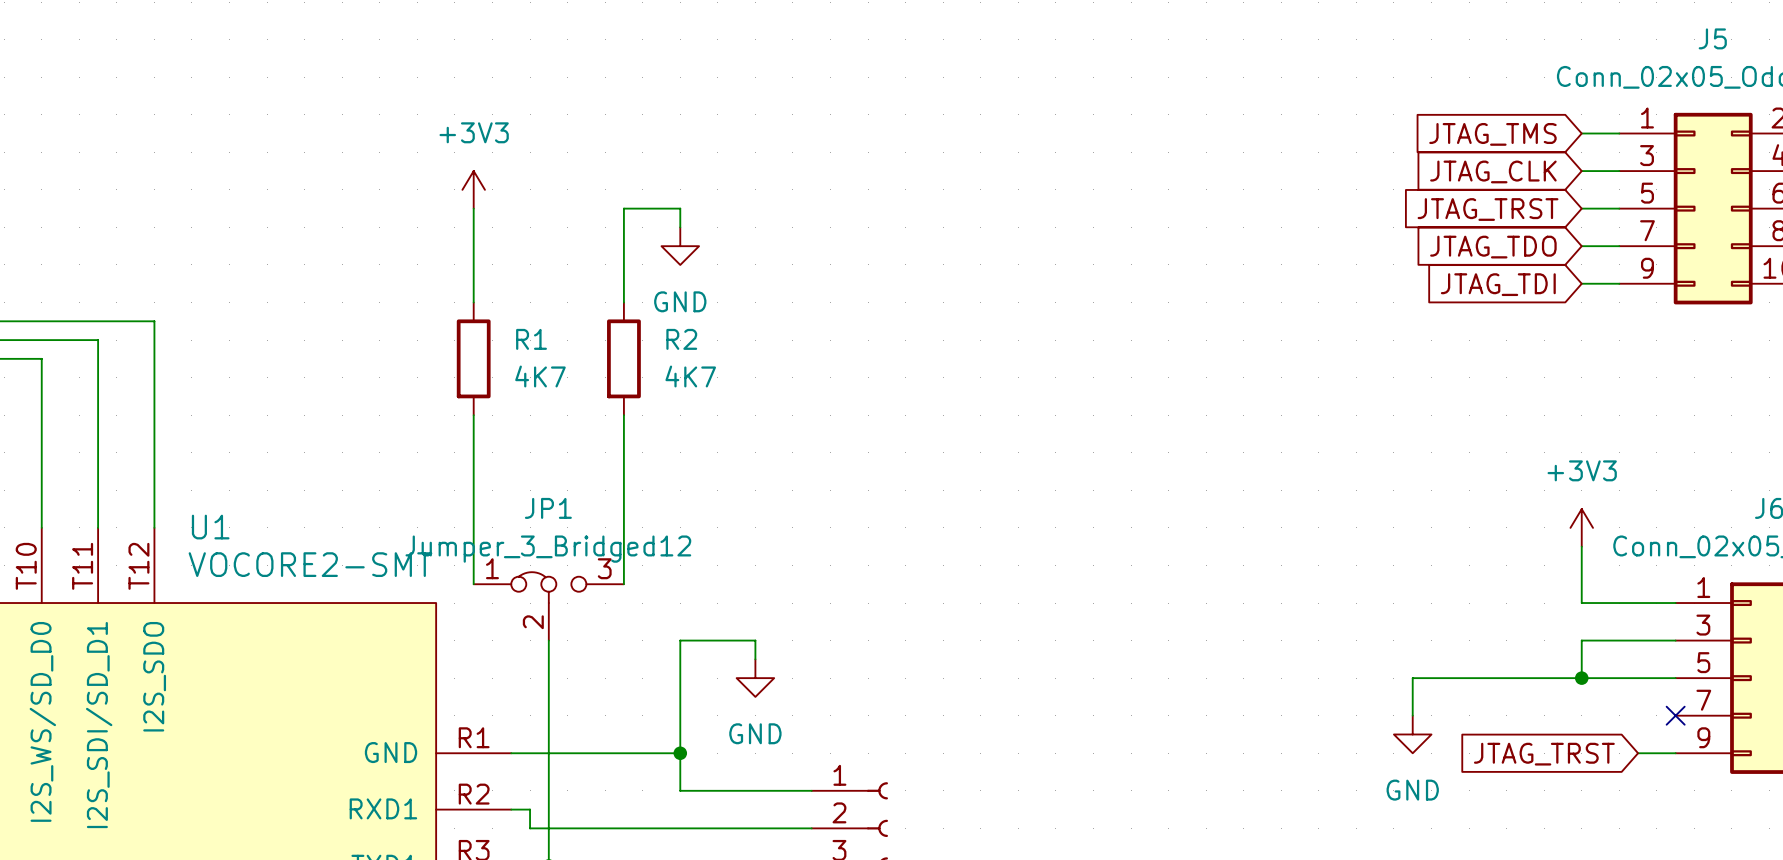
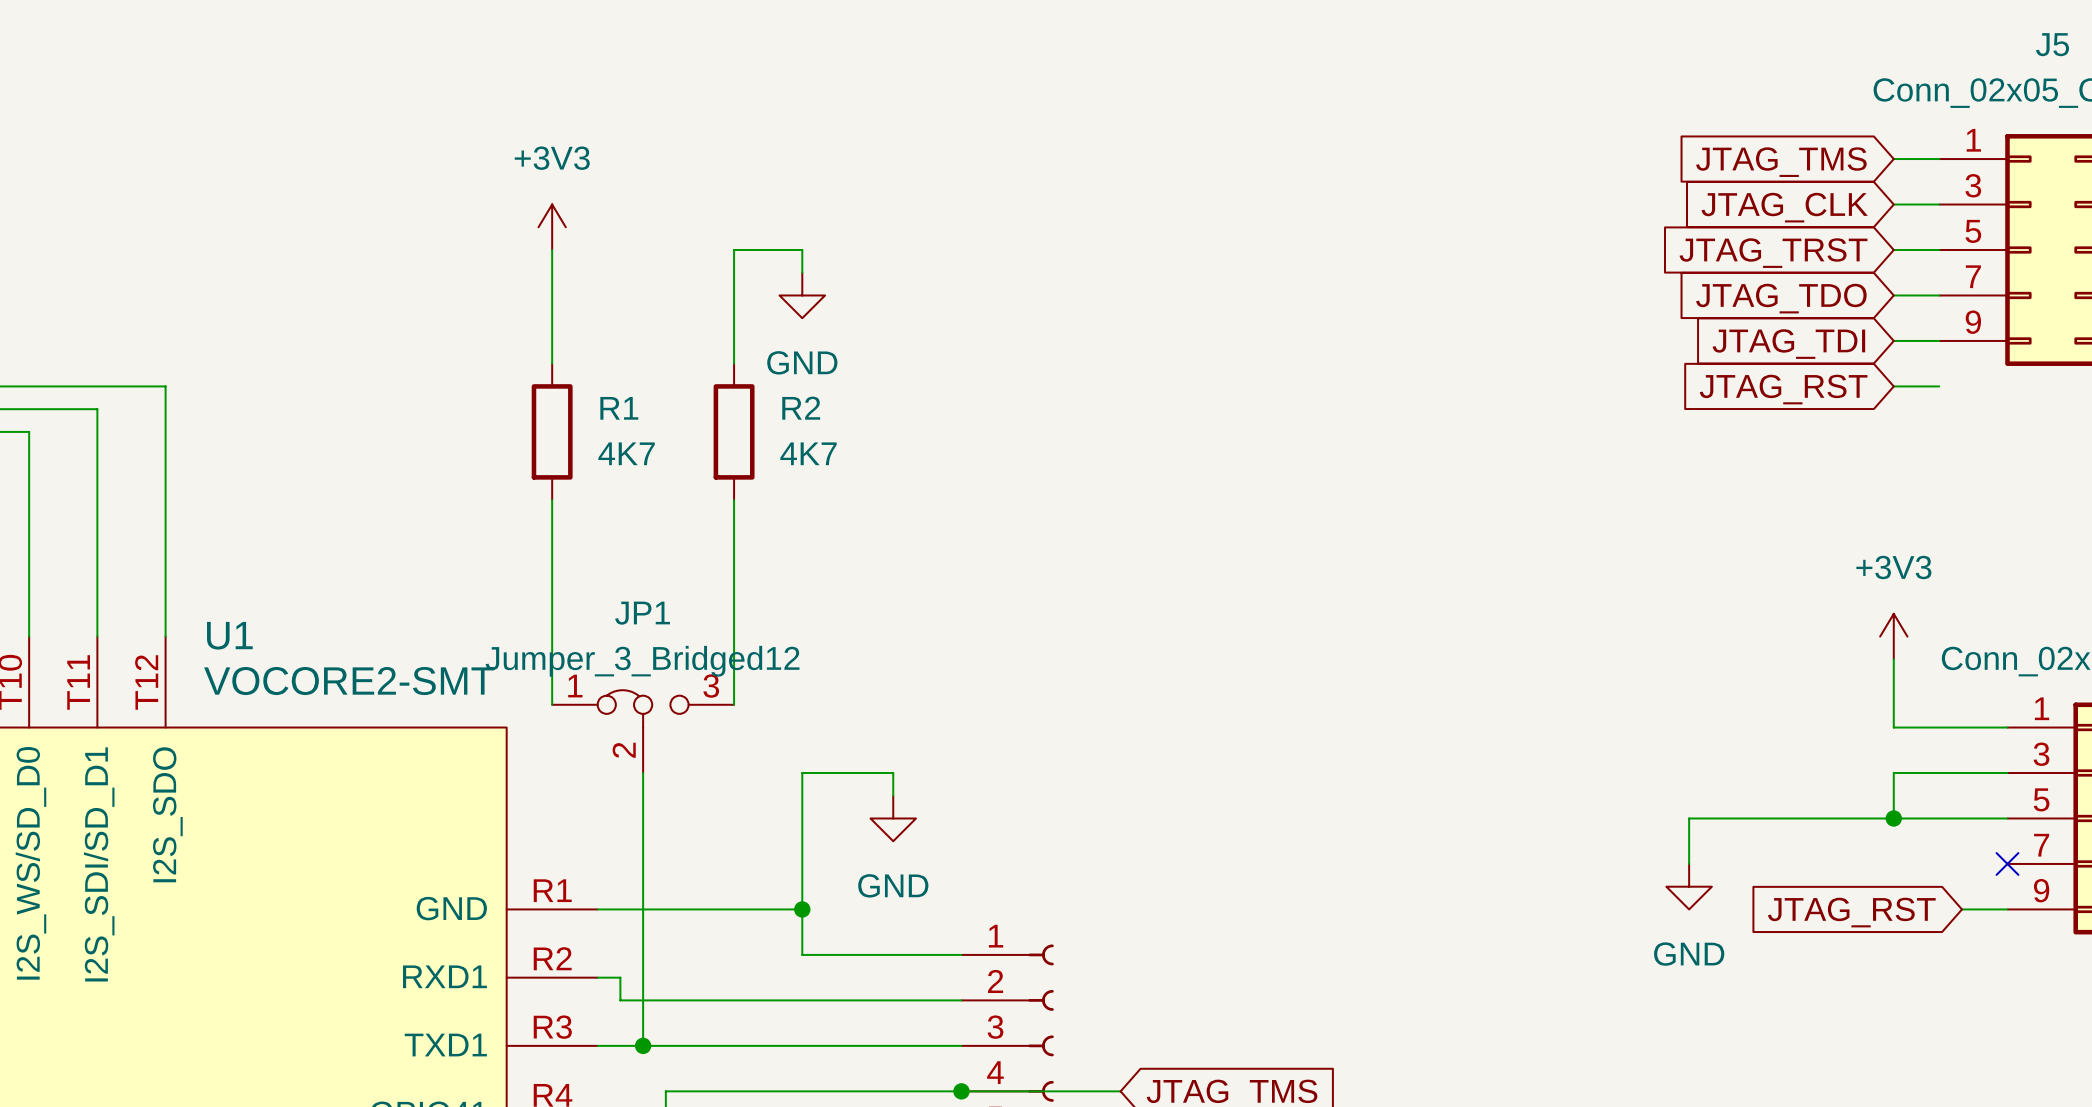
wire: none -> (1893, 386) (1939, 386)
global label: none -> JTAG_RST (1783, 389)
global label: JTAG_TRST (1544, 754) -> JTAG_RST (1851, 912)

